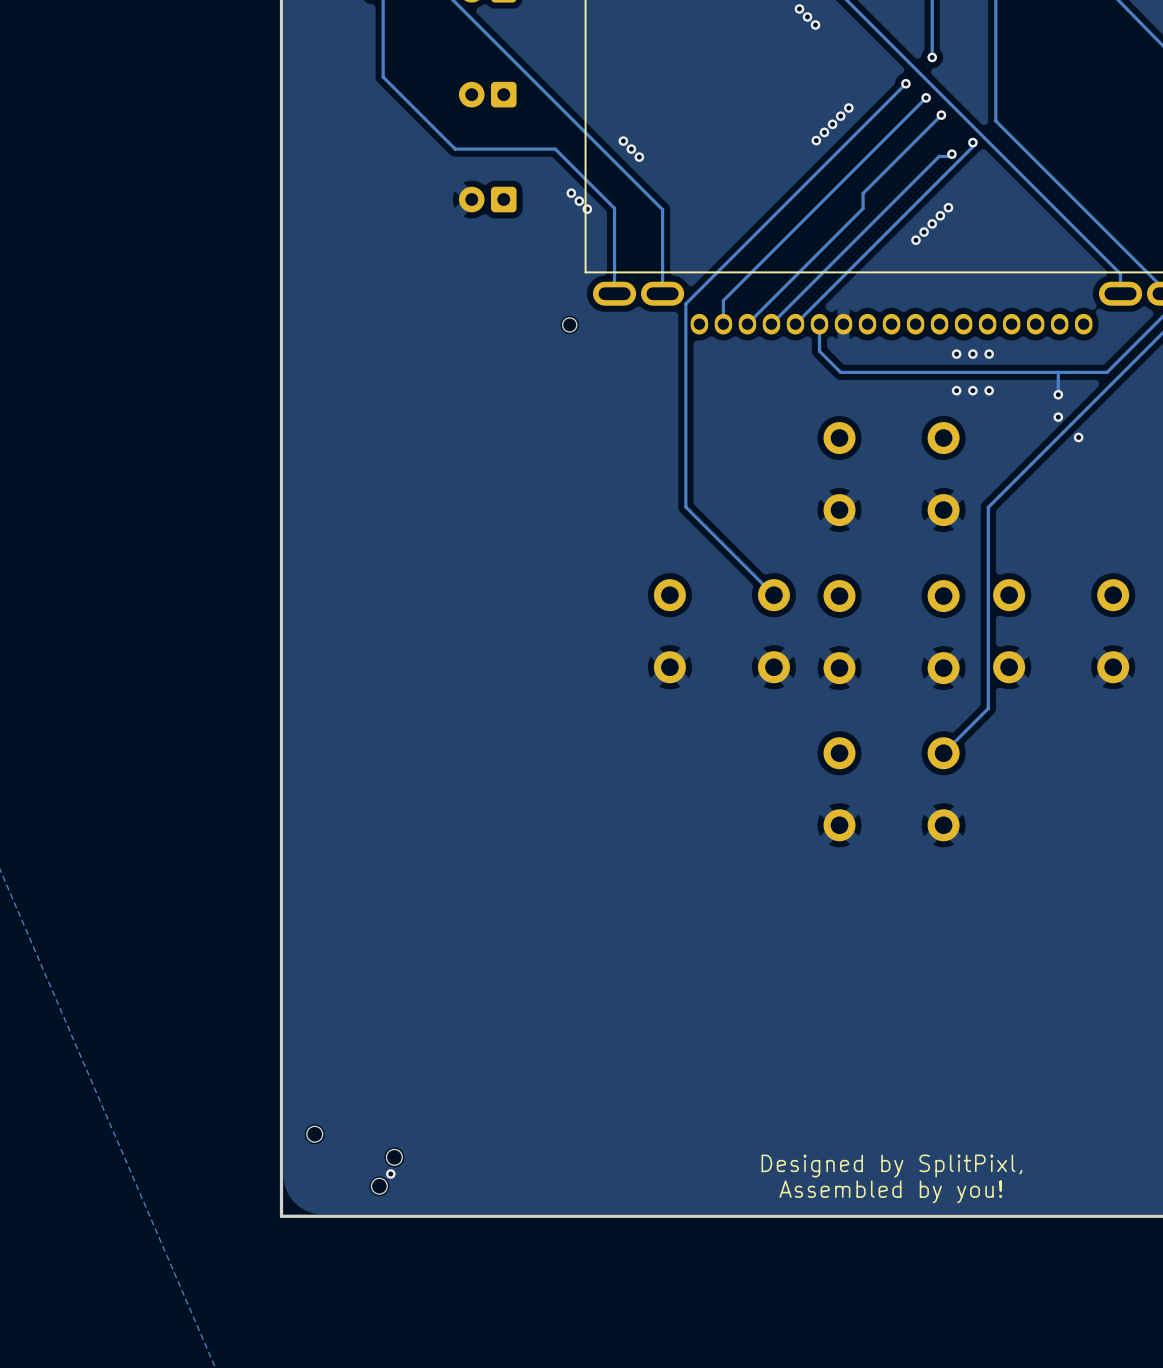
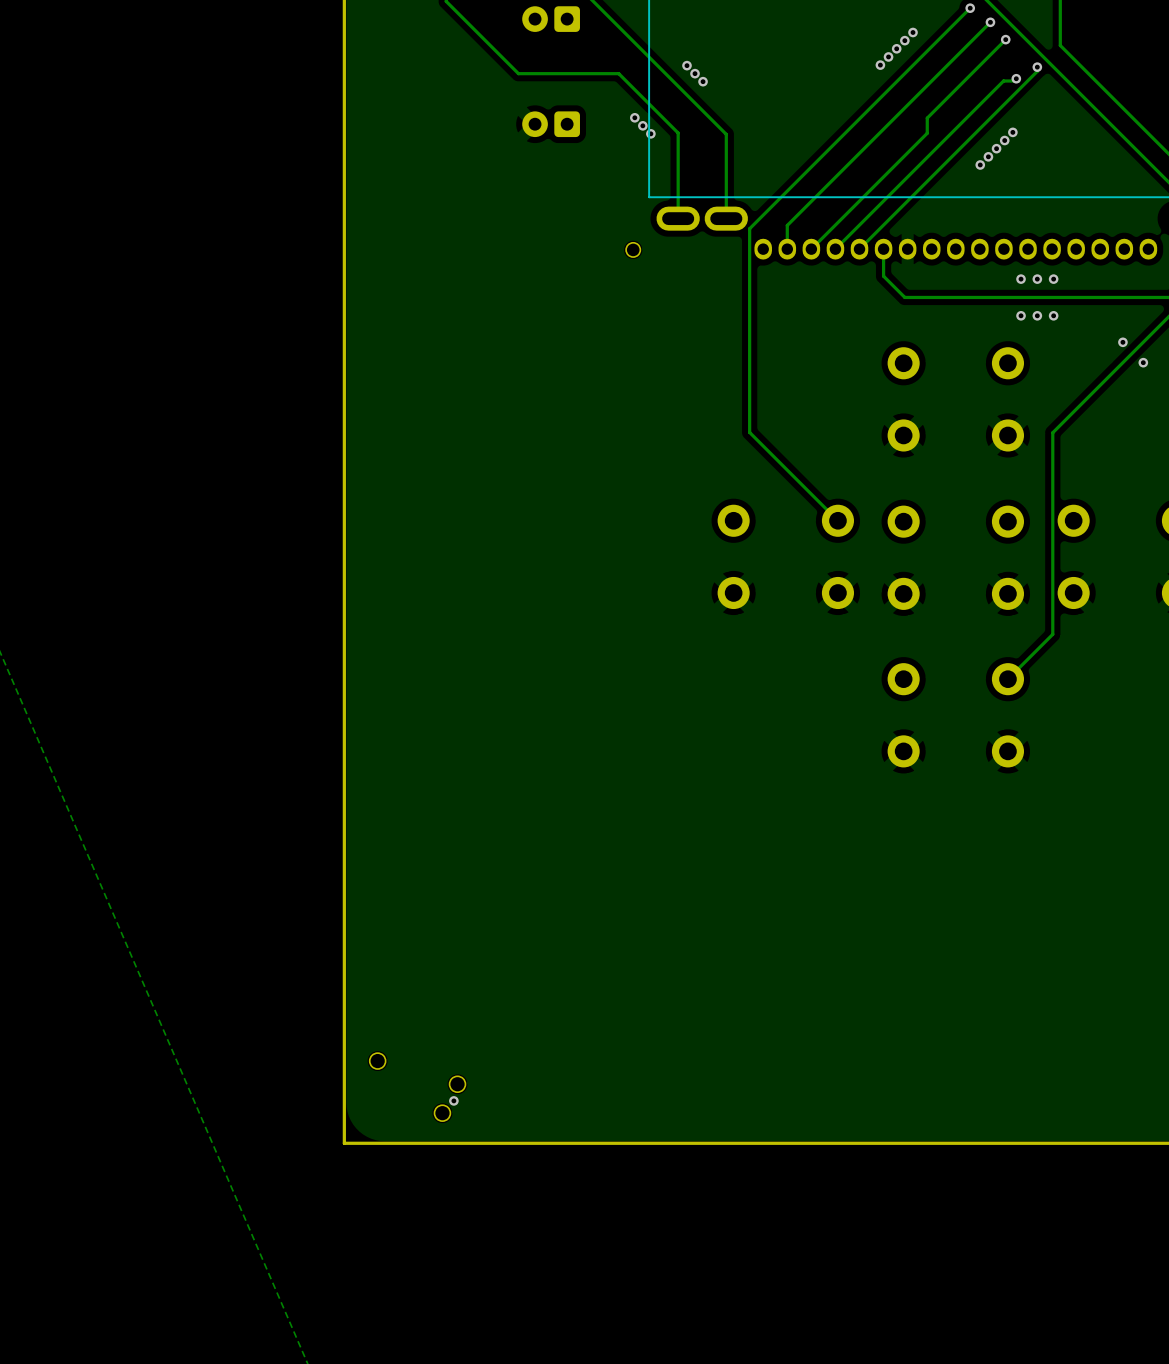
track: (1058, 372) (1058, 394) -> none
via: (1058, 394) -> none
text: Designed by SplitPixl, (891, 1166) -> none
text: Assembled by you! (890, 1191) -> none

